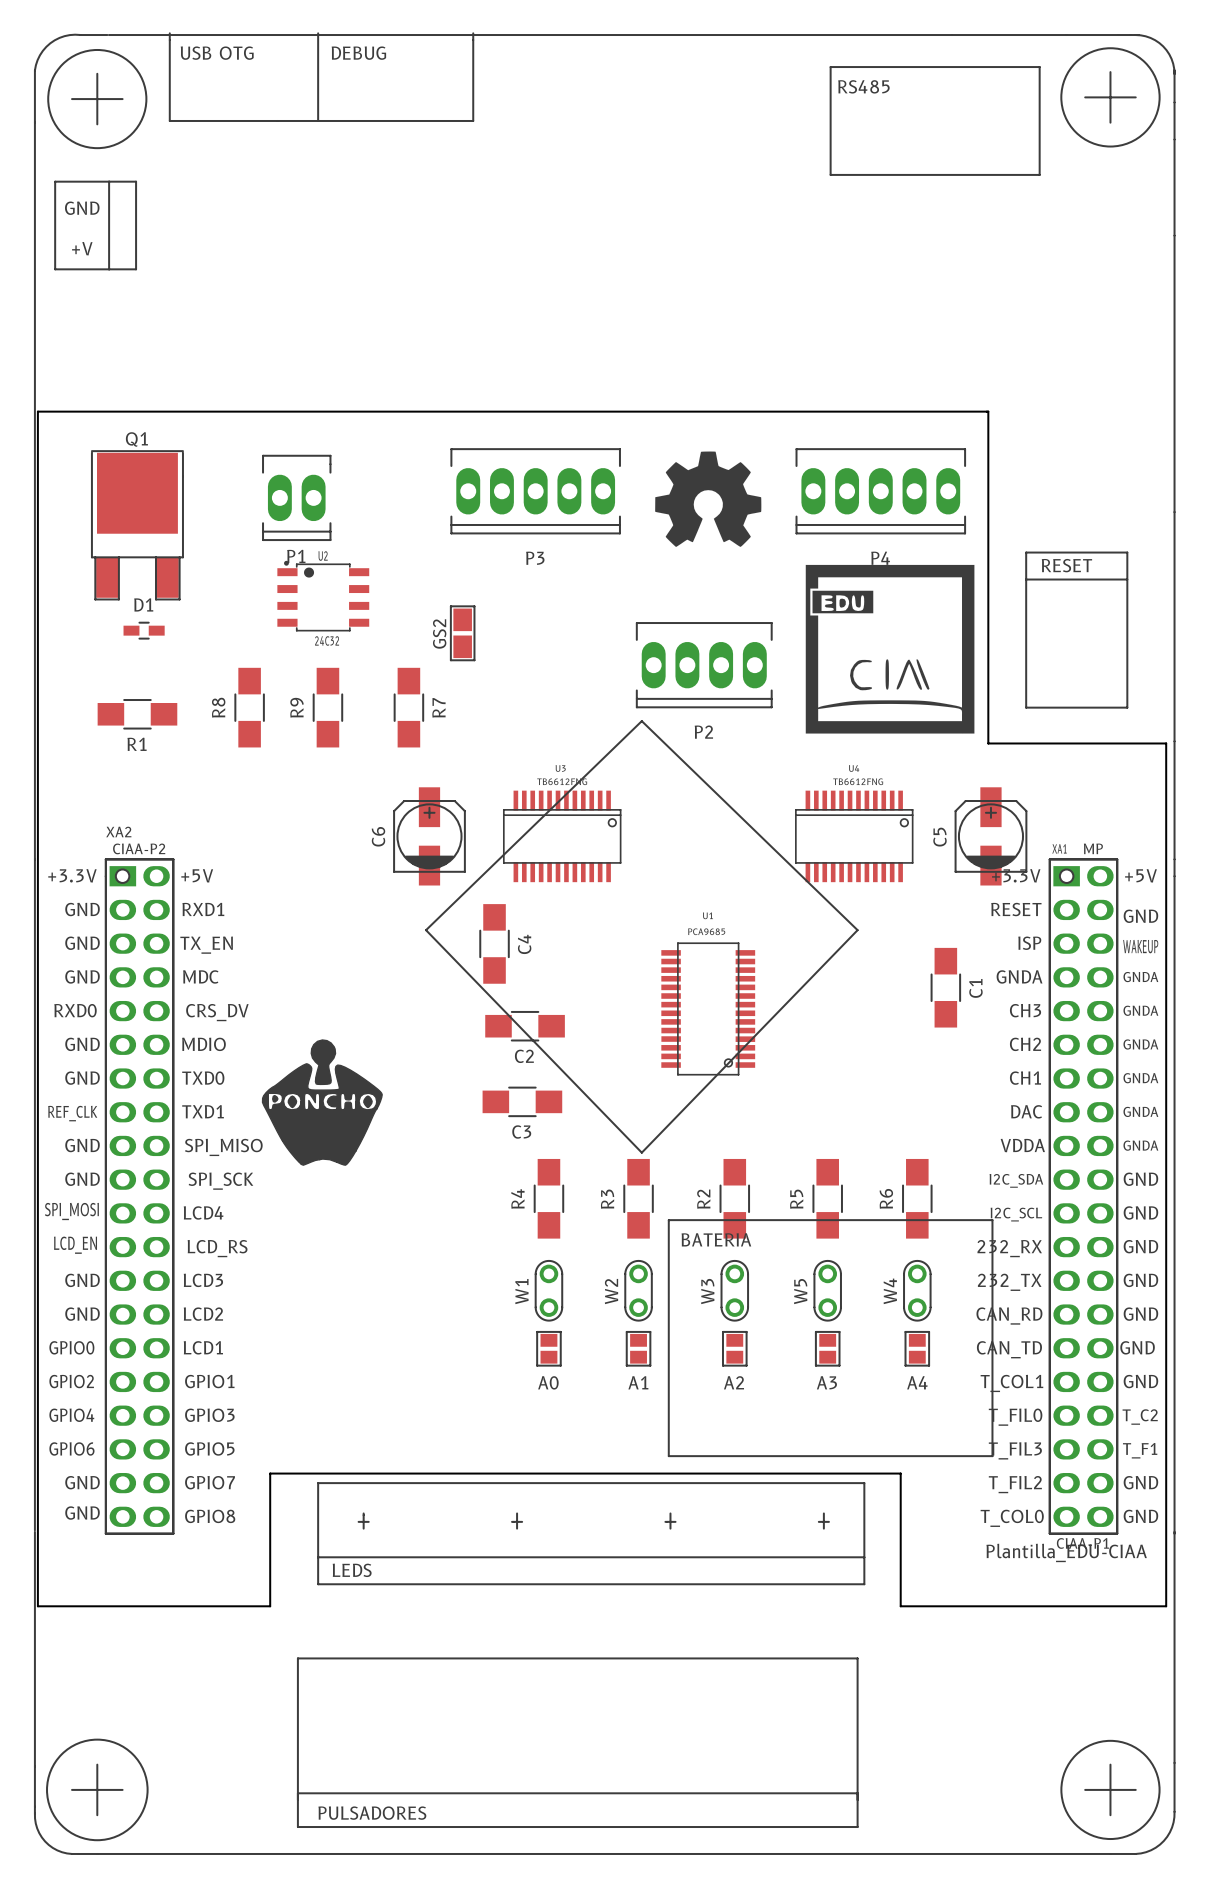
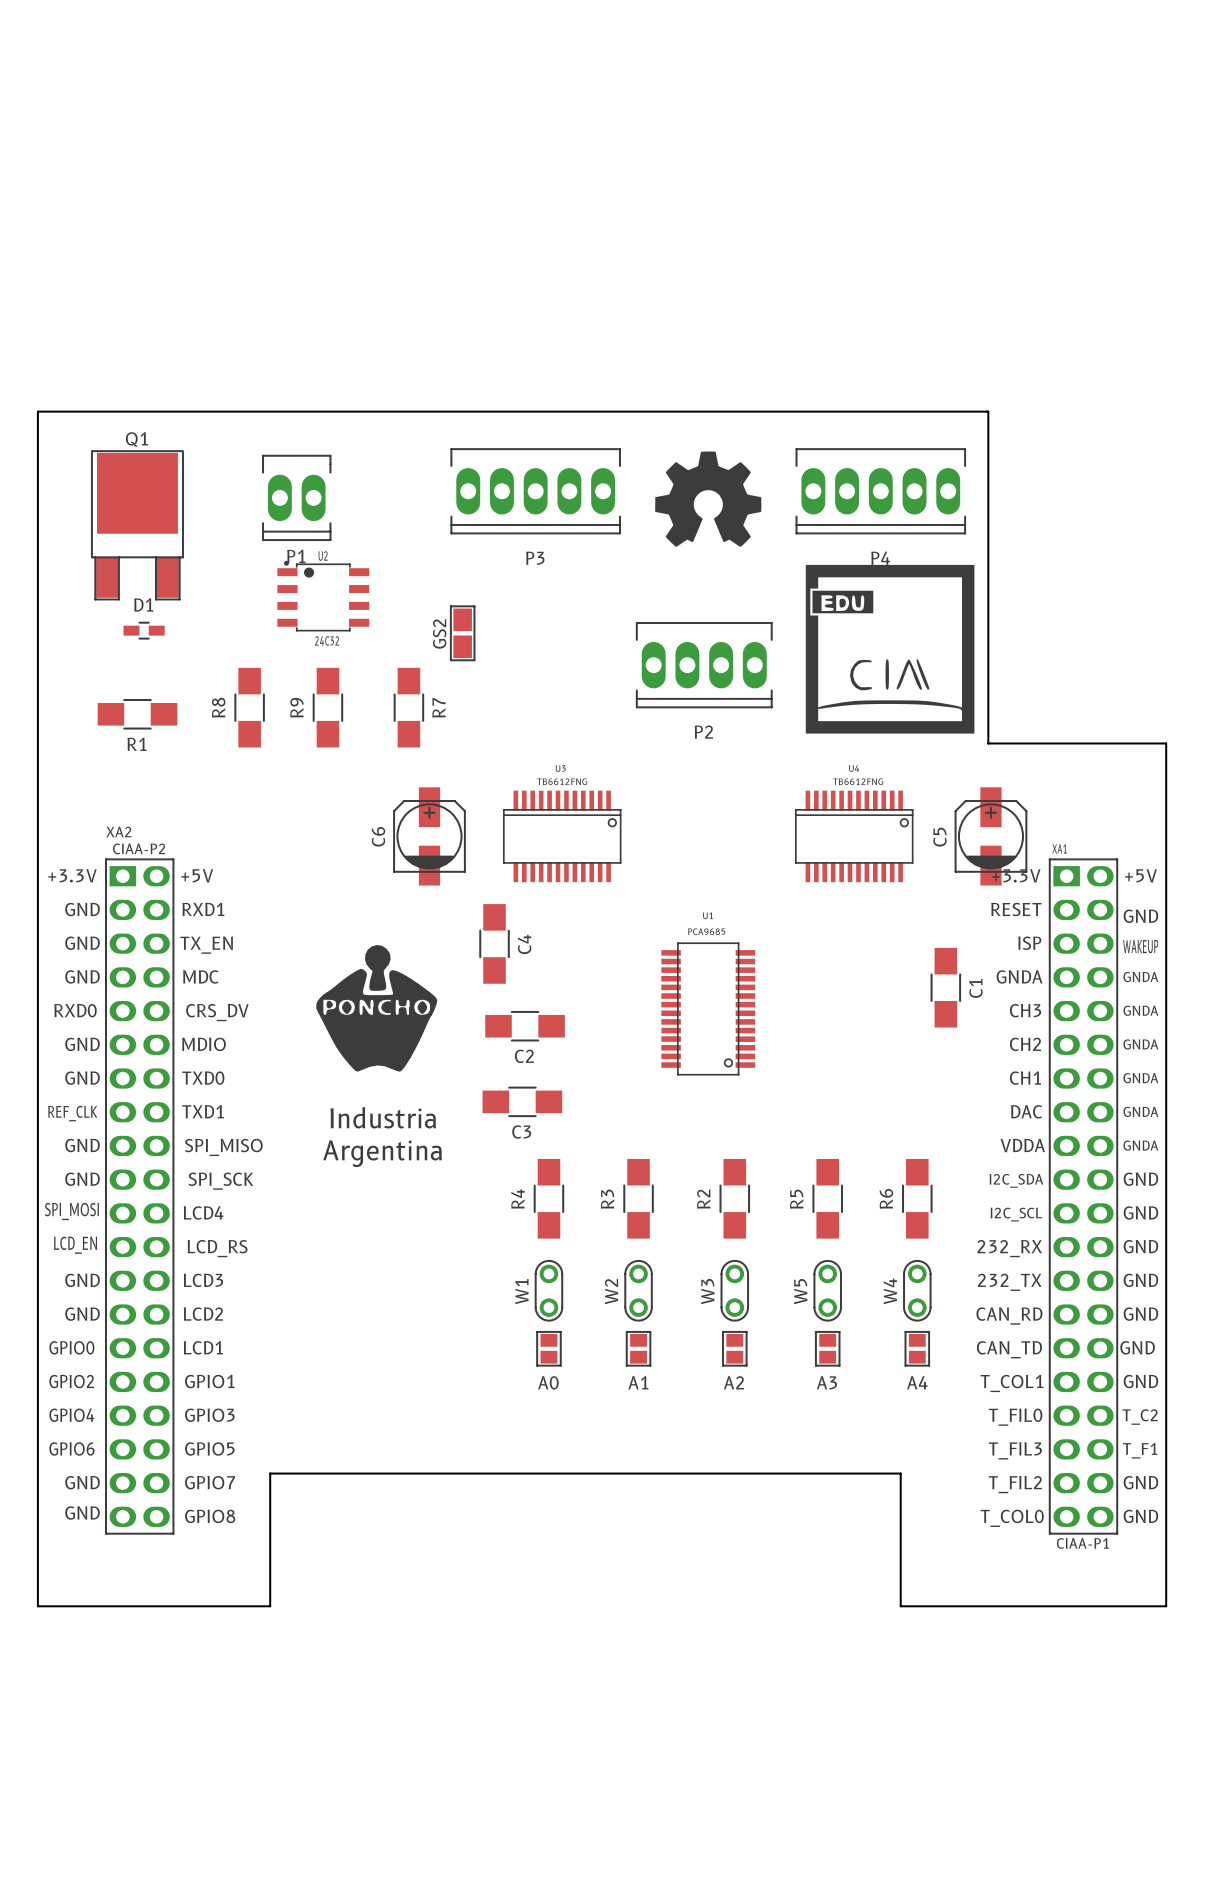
MP: Plantilla_EDU-CIAA (604, 943) -> none
drawing position: (322, 1102) -> (376, 1008)
text: none -> Industria (383, 1117)
text: none -> Argentina (382, 1153)

